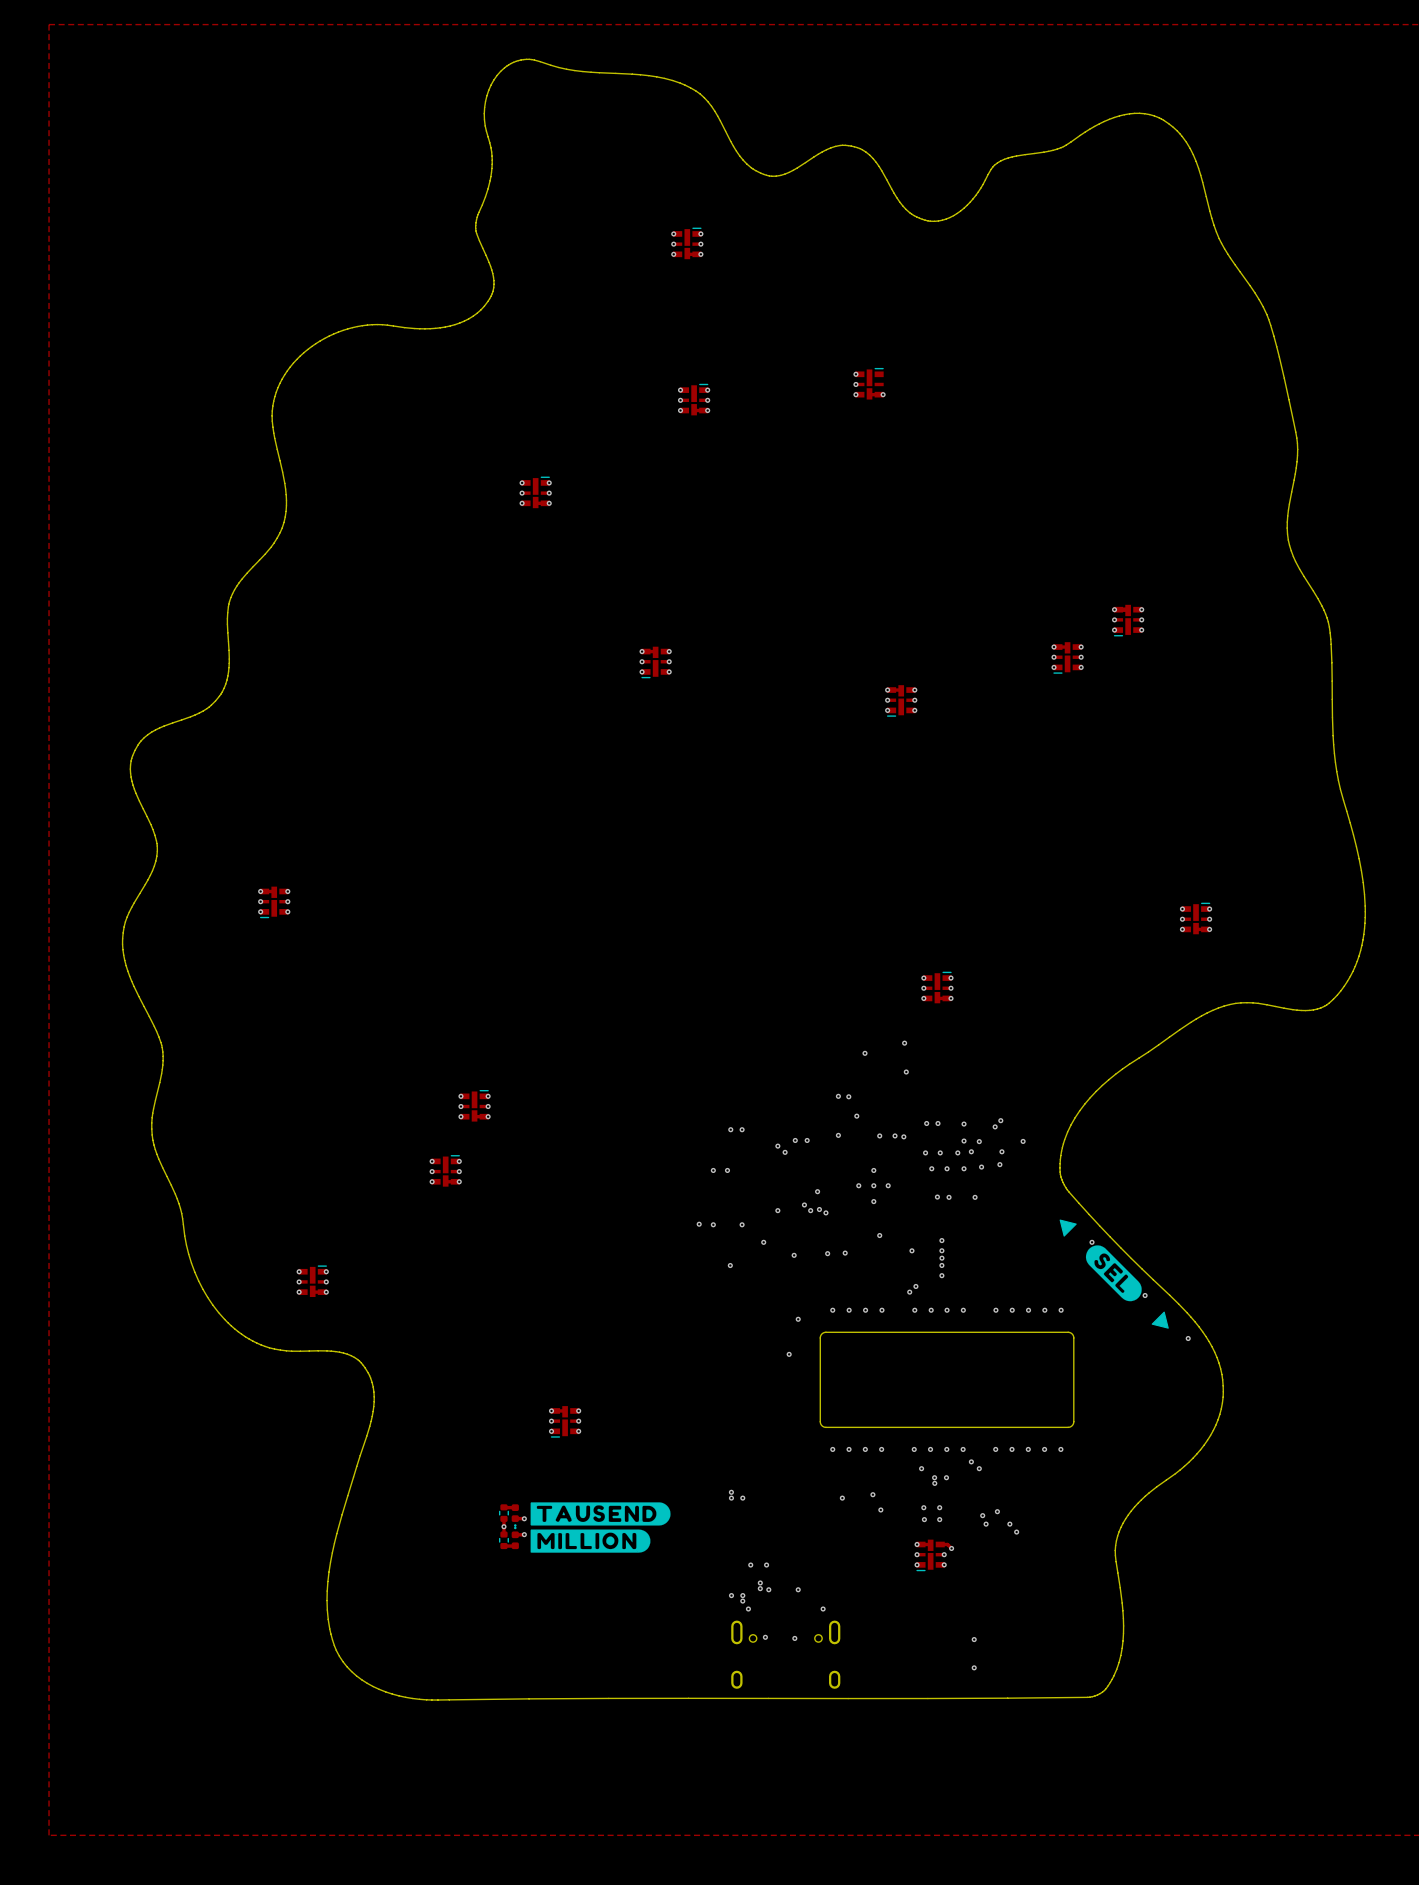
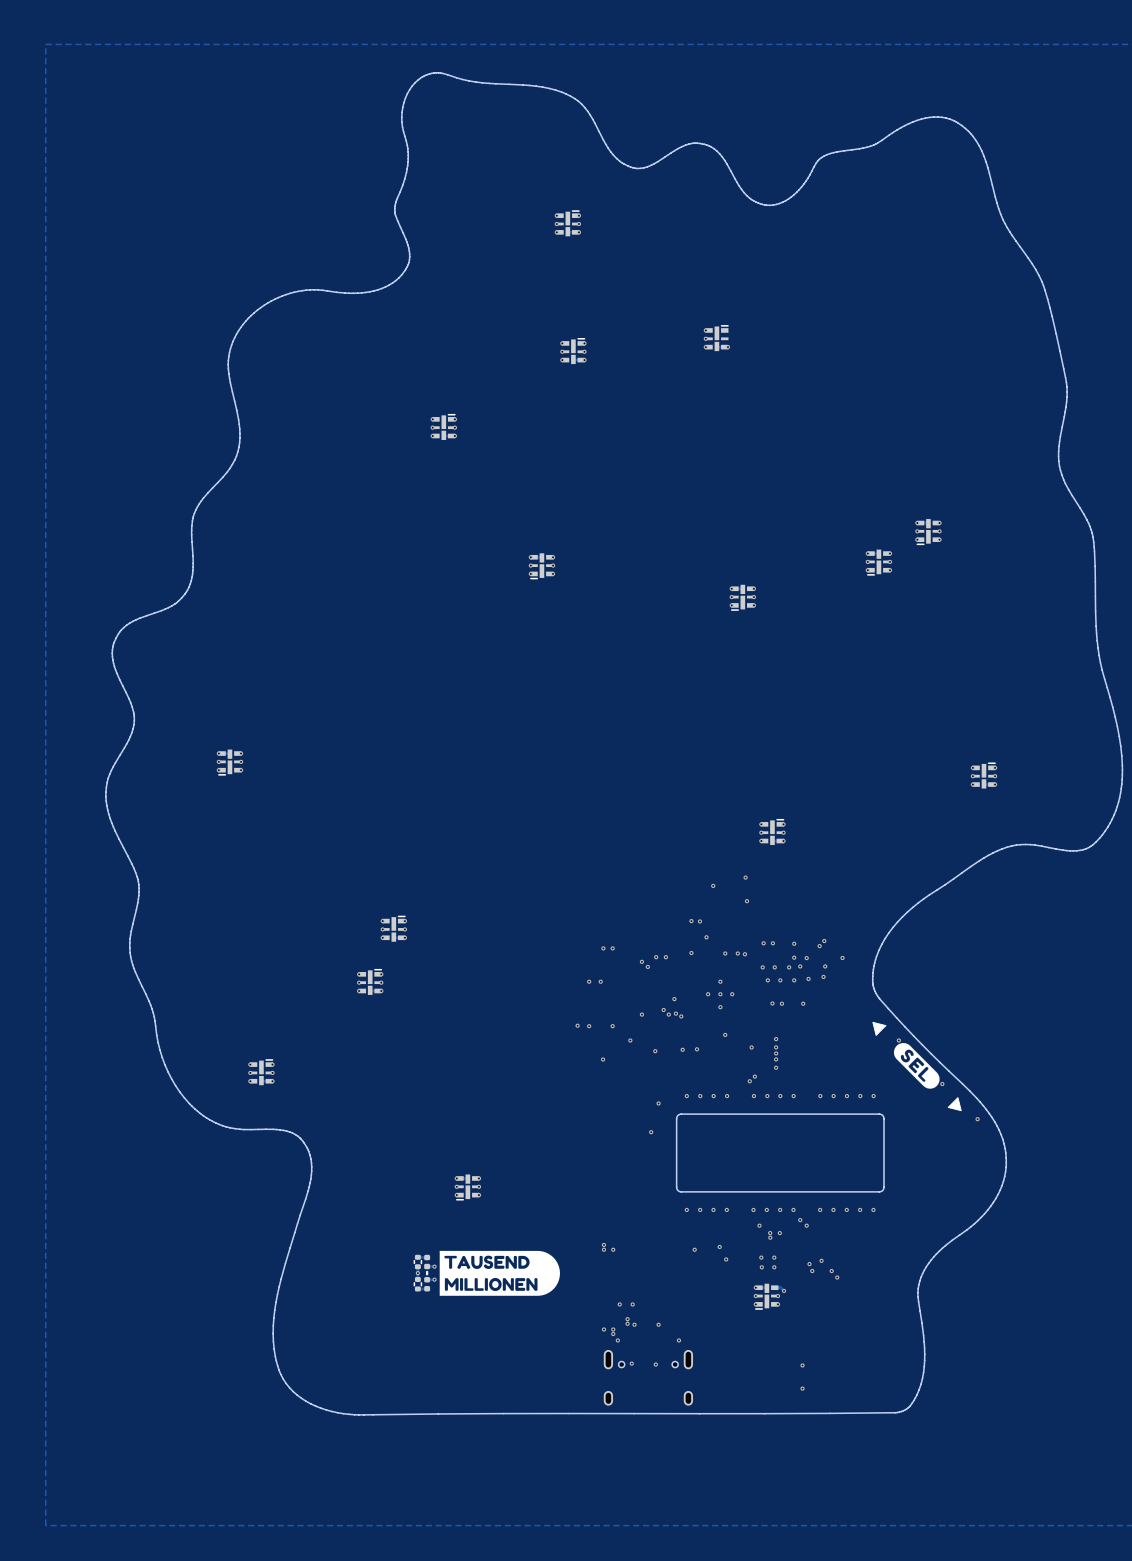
drawing: none -> [439, 1250, 560, 1296]
drawing: [530, 1502, 671, 1553] -> none

